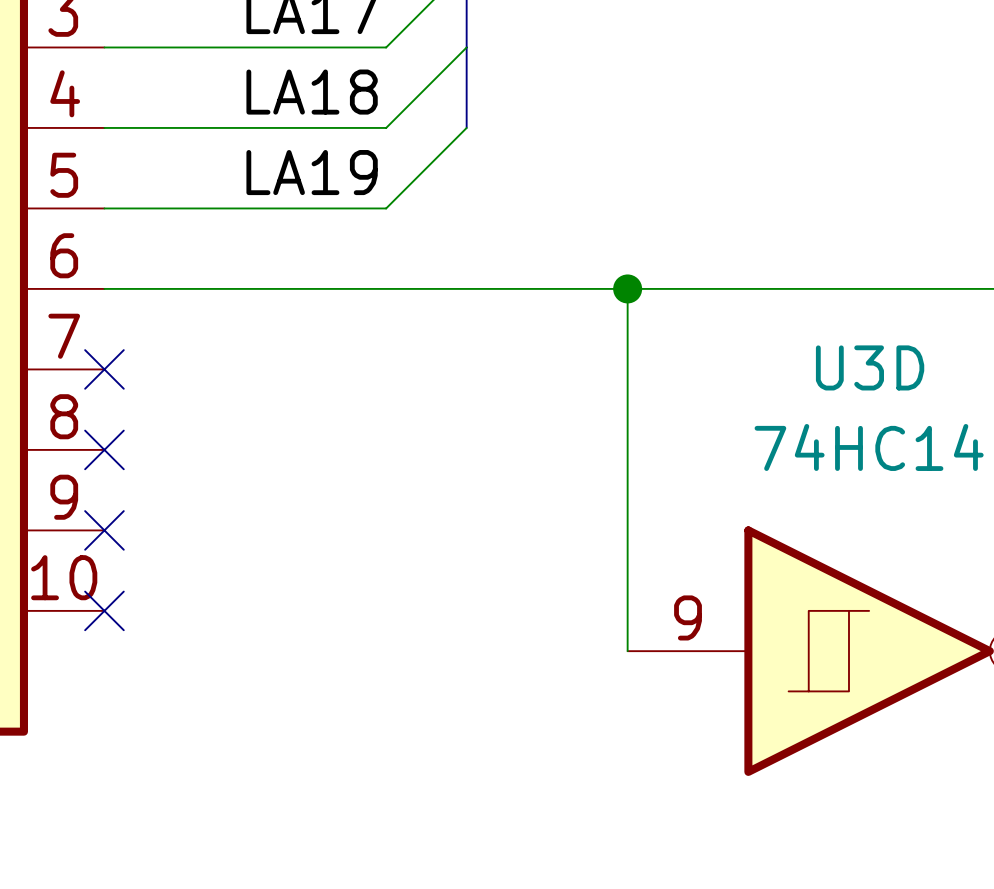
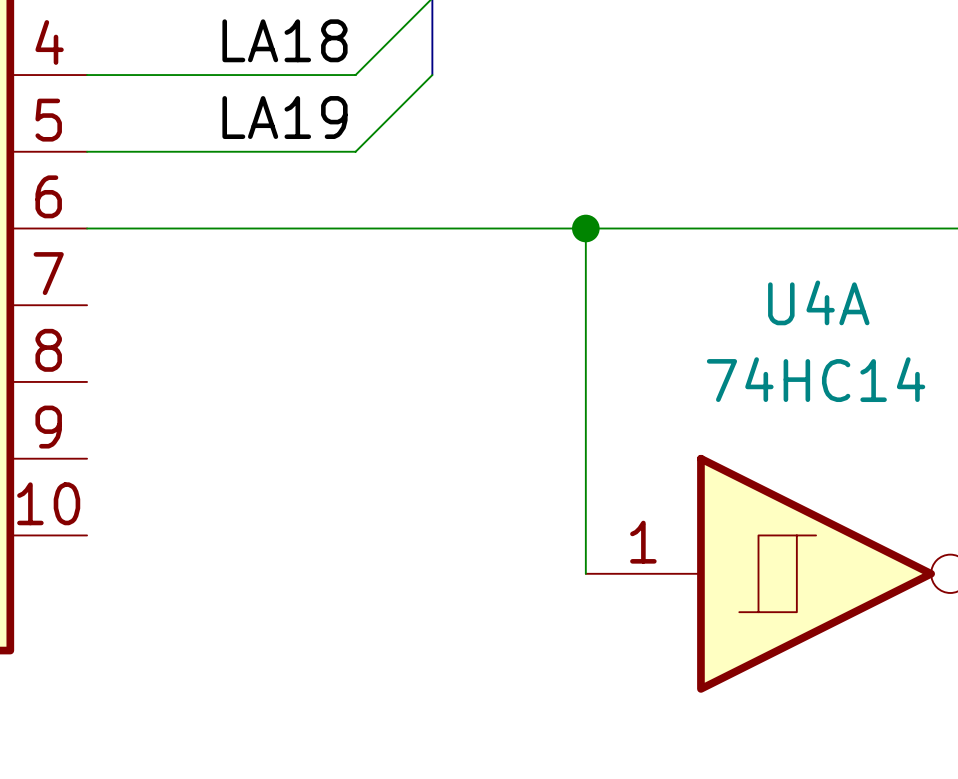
U3D name: U3D (870, 367) -> U4A (818, 302)
no-connect mark: (104, 369) -> none
no-connect mark: (104, 449) -> none
no-connect mark: (104, 530) -> none
no-connect mark: (104, 610) -> none
U3D pin number: 9 (688, 617) -> 1 (643, 542)

